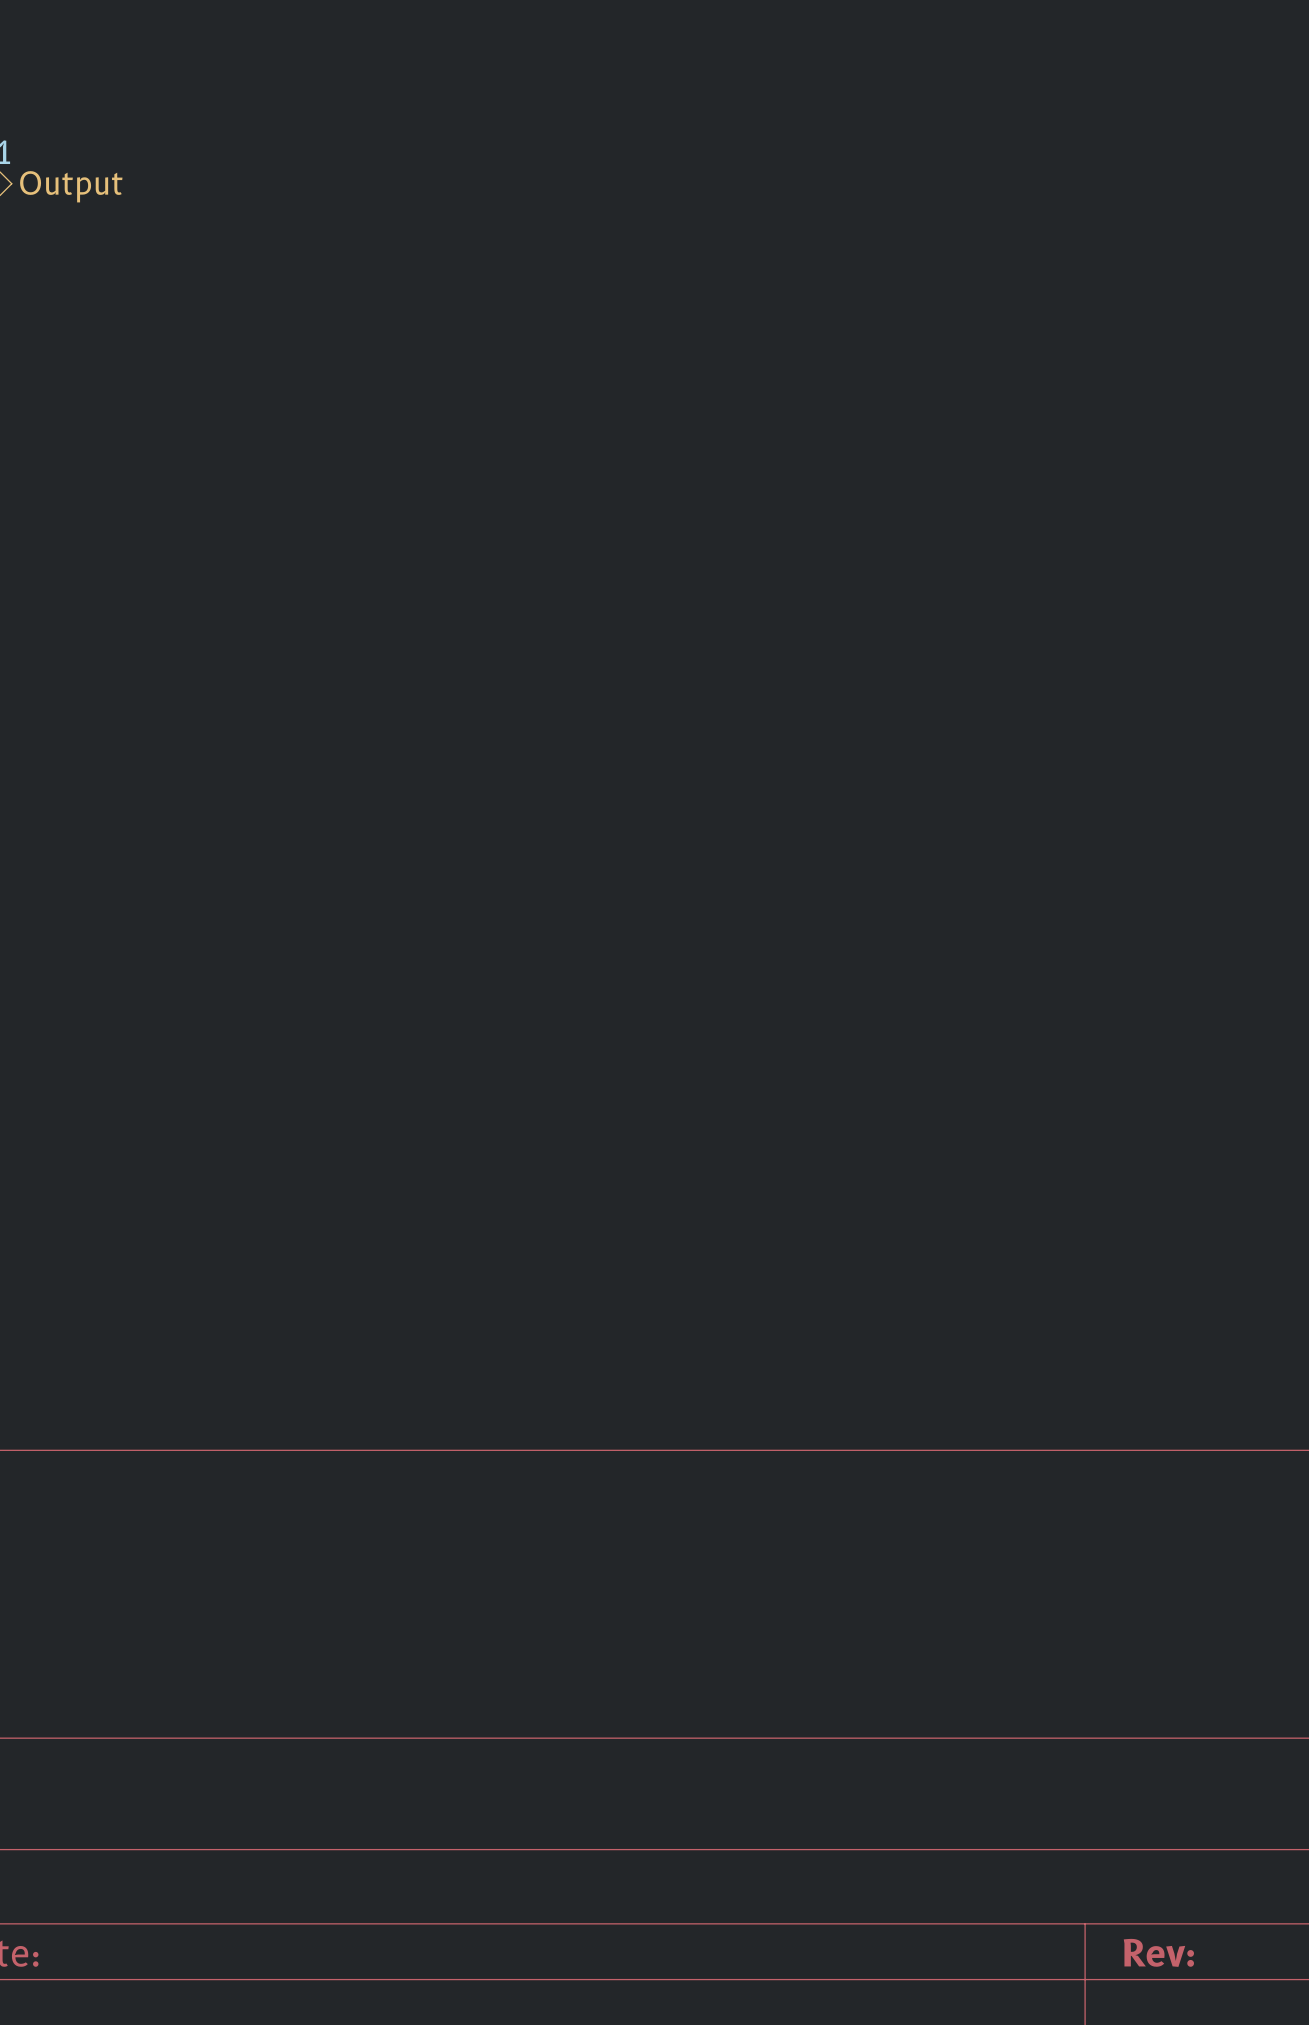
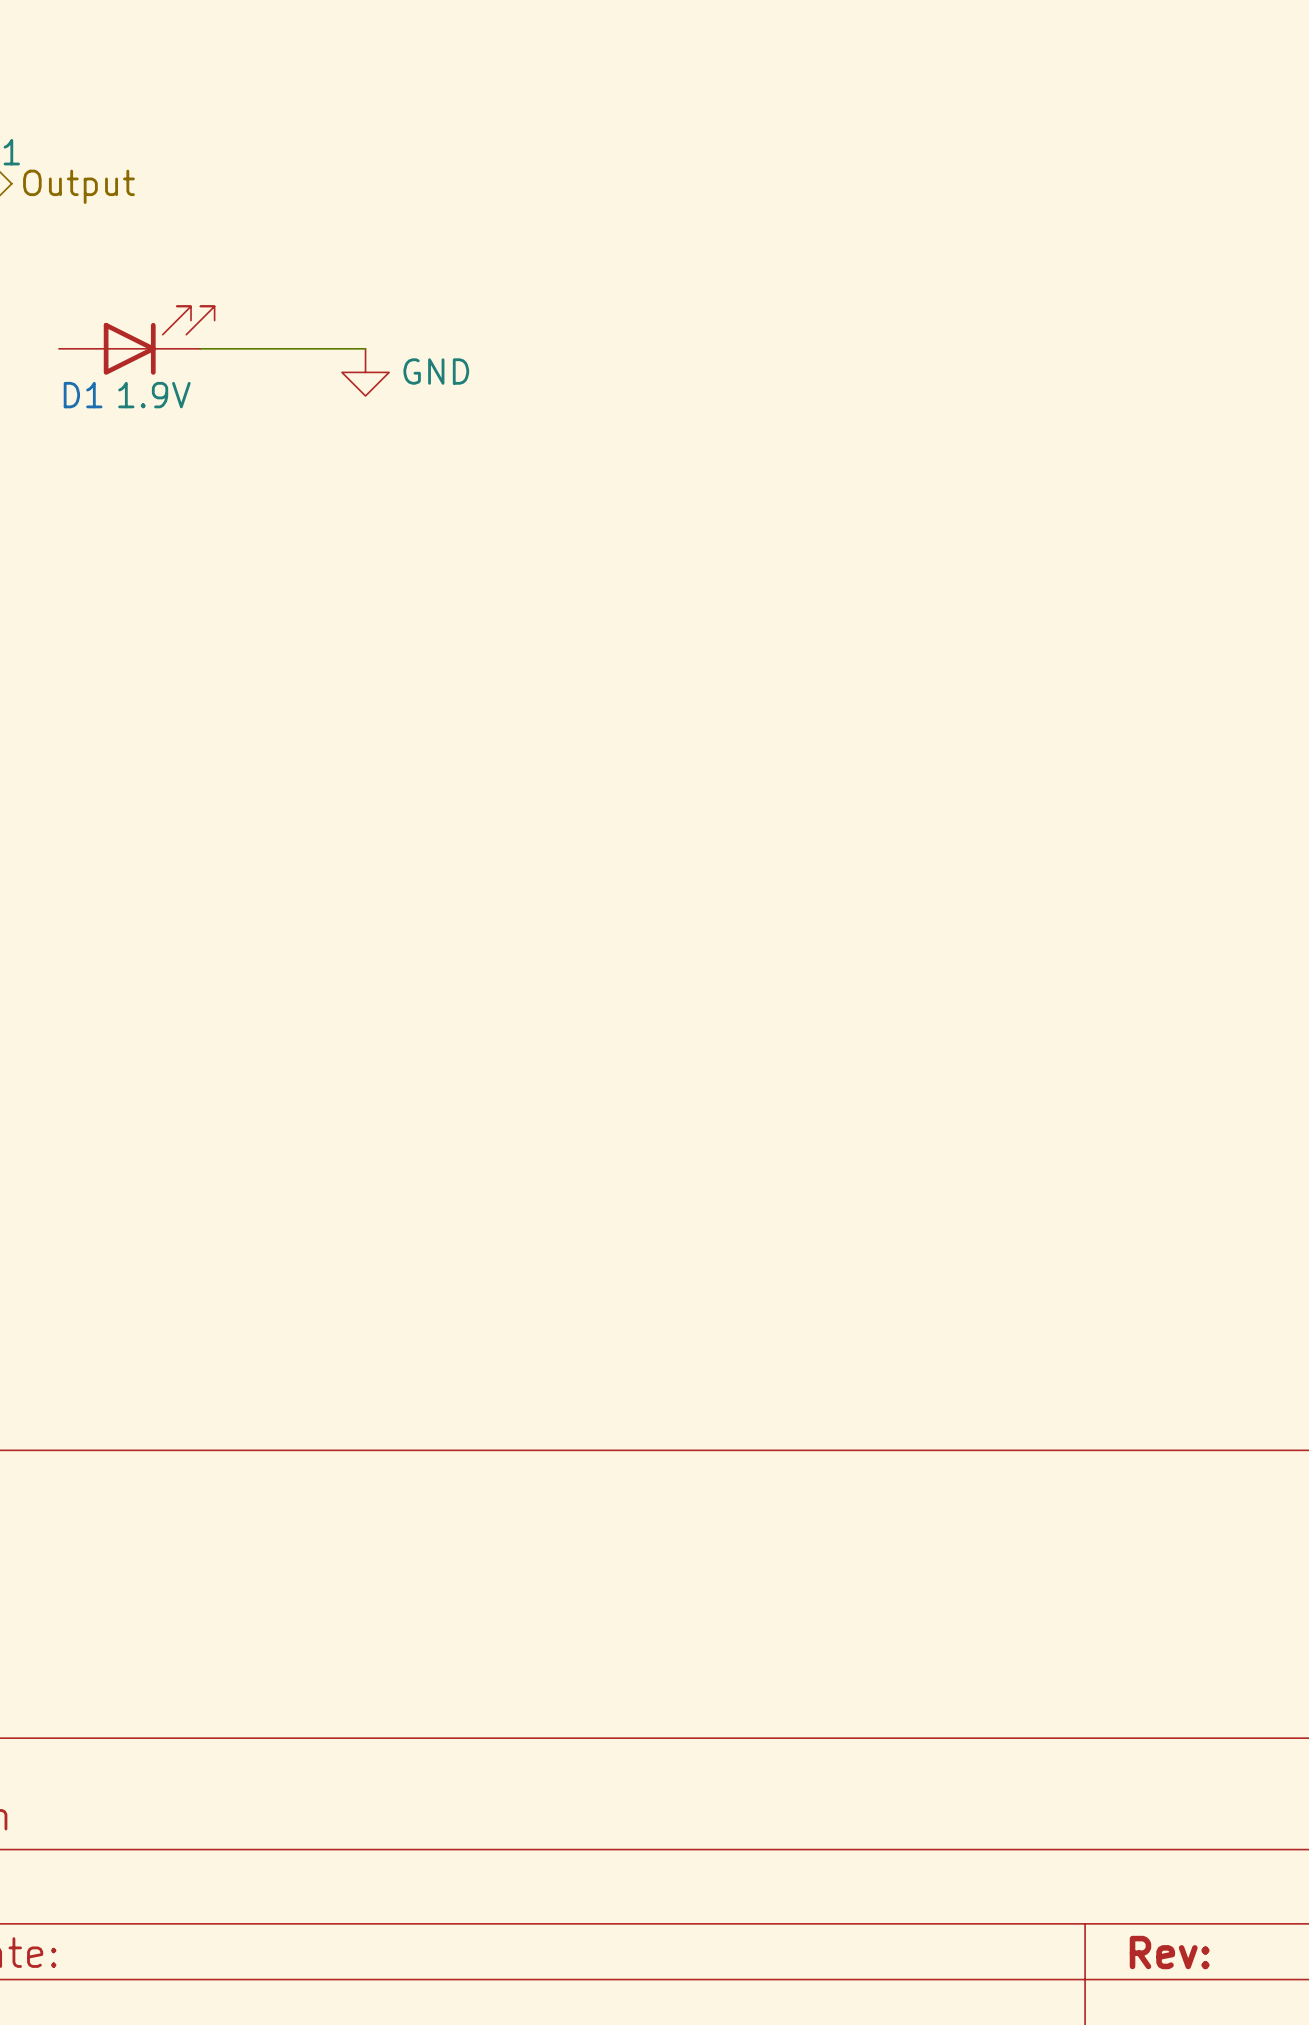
D1: none -> 1.9V (136, 340)
wire: none -> (200, 348) (365, 348)
power symbol: none -> GND (365, 372)

